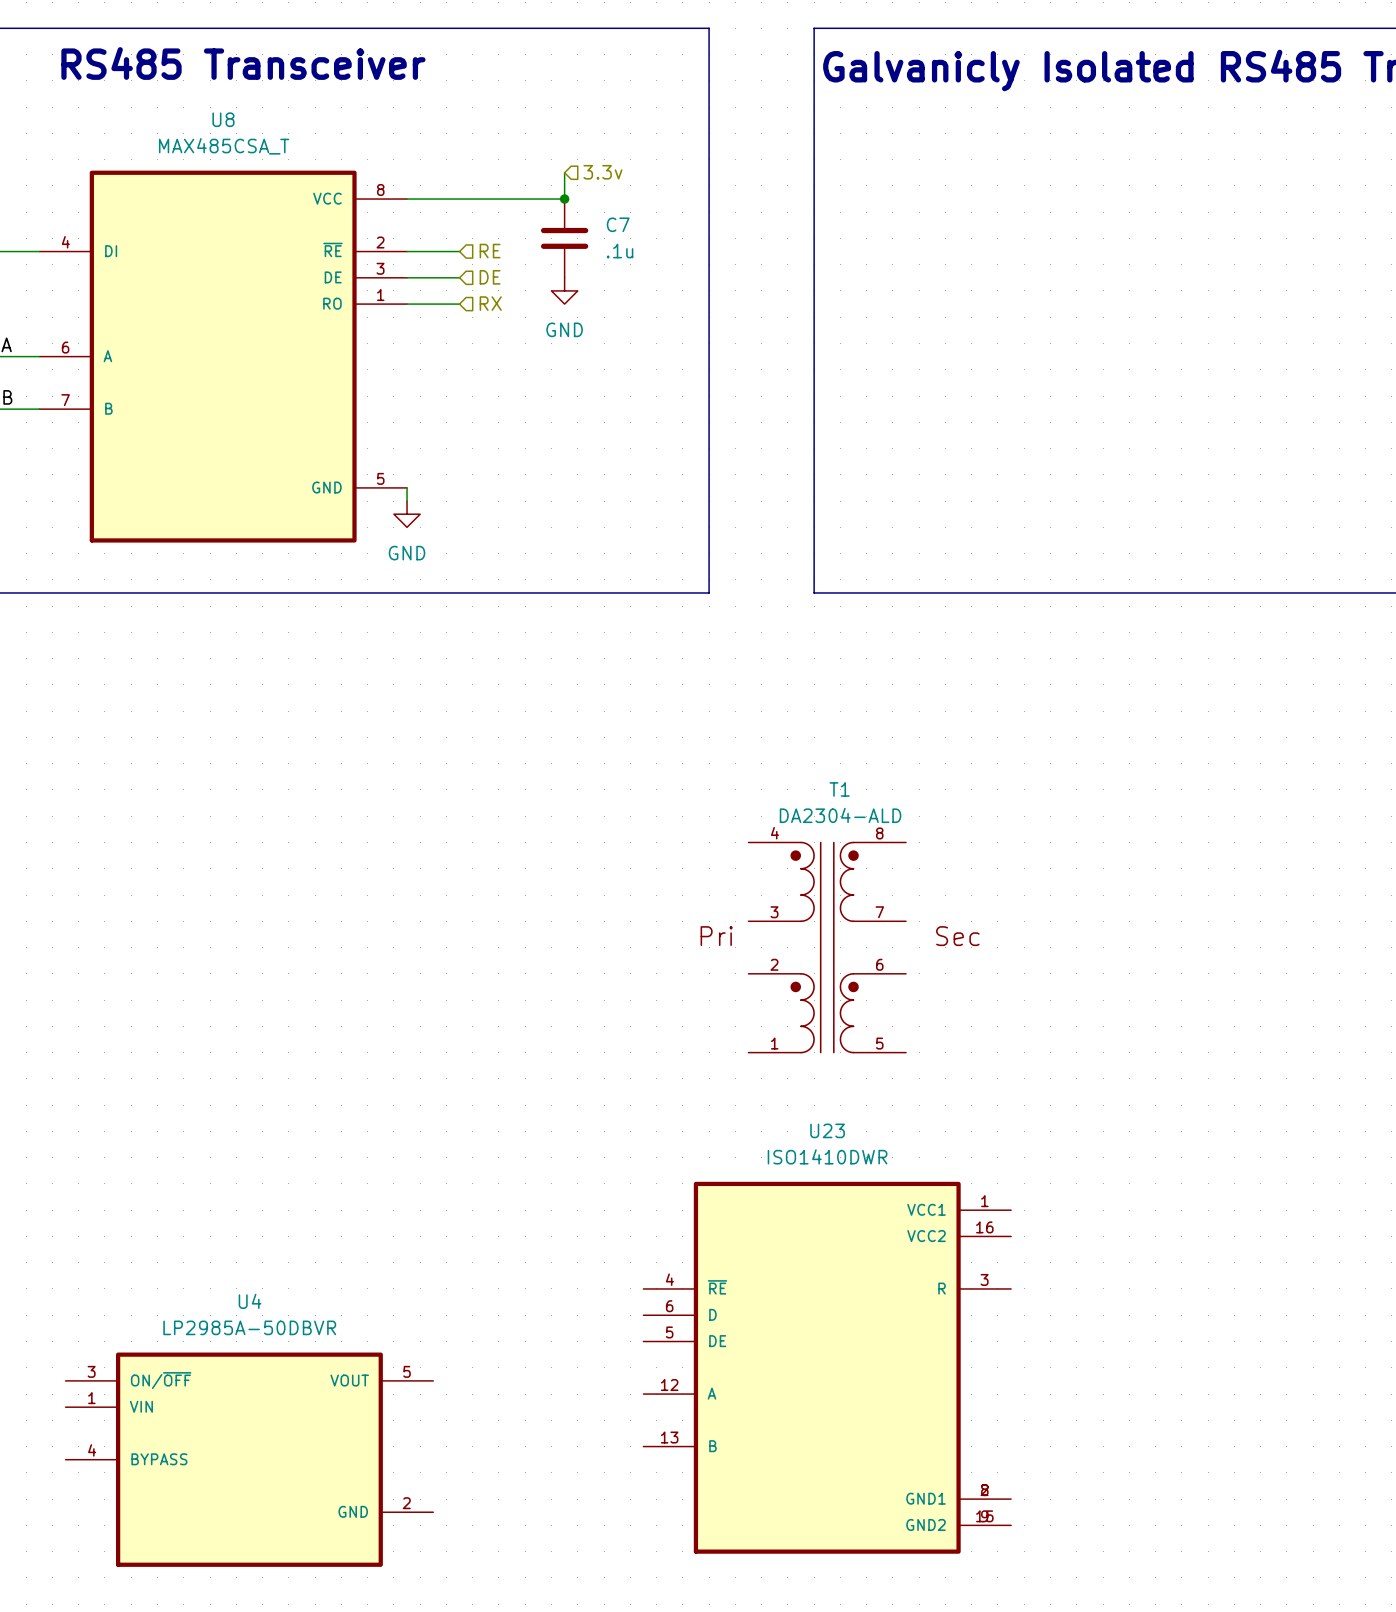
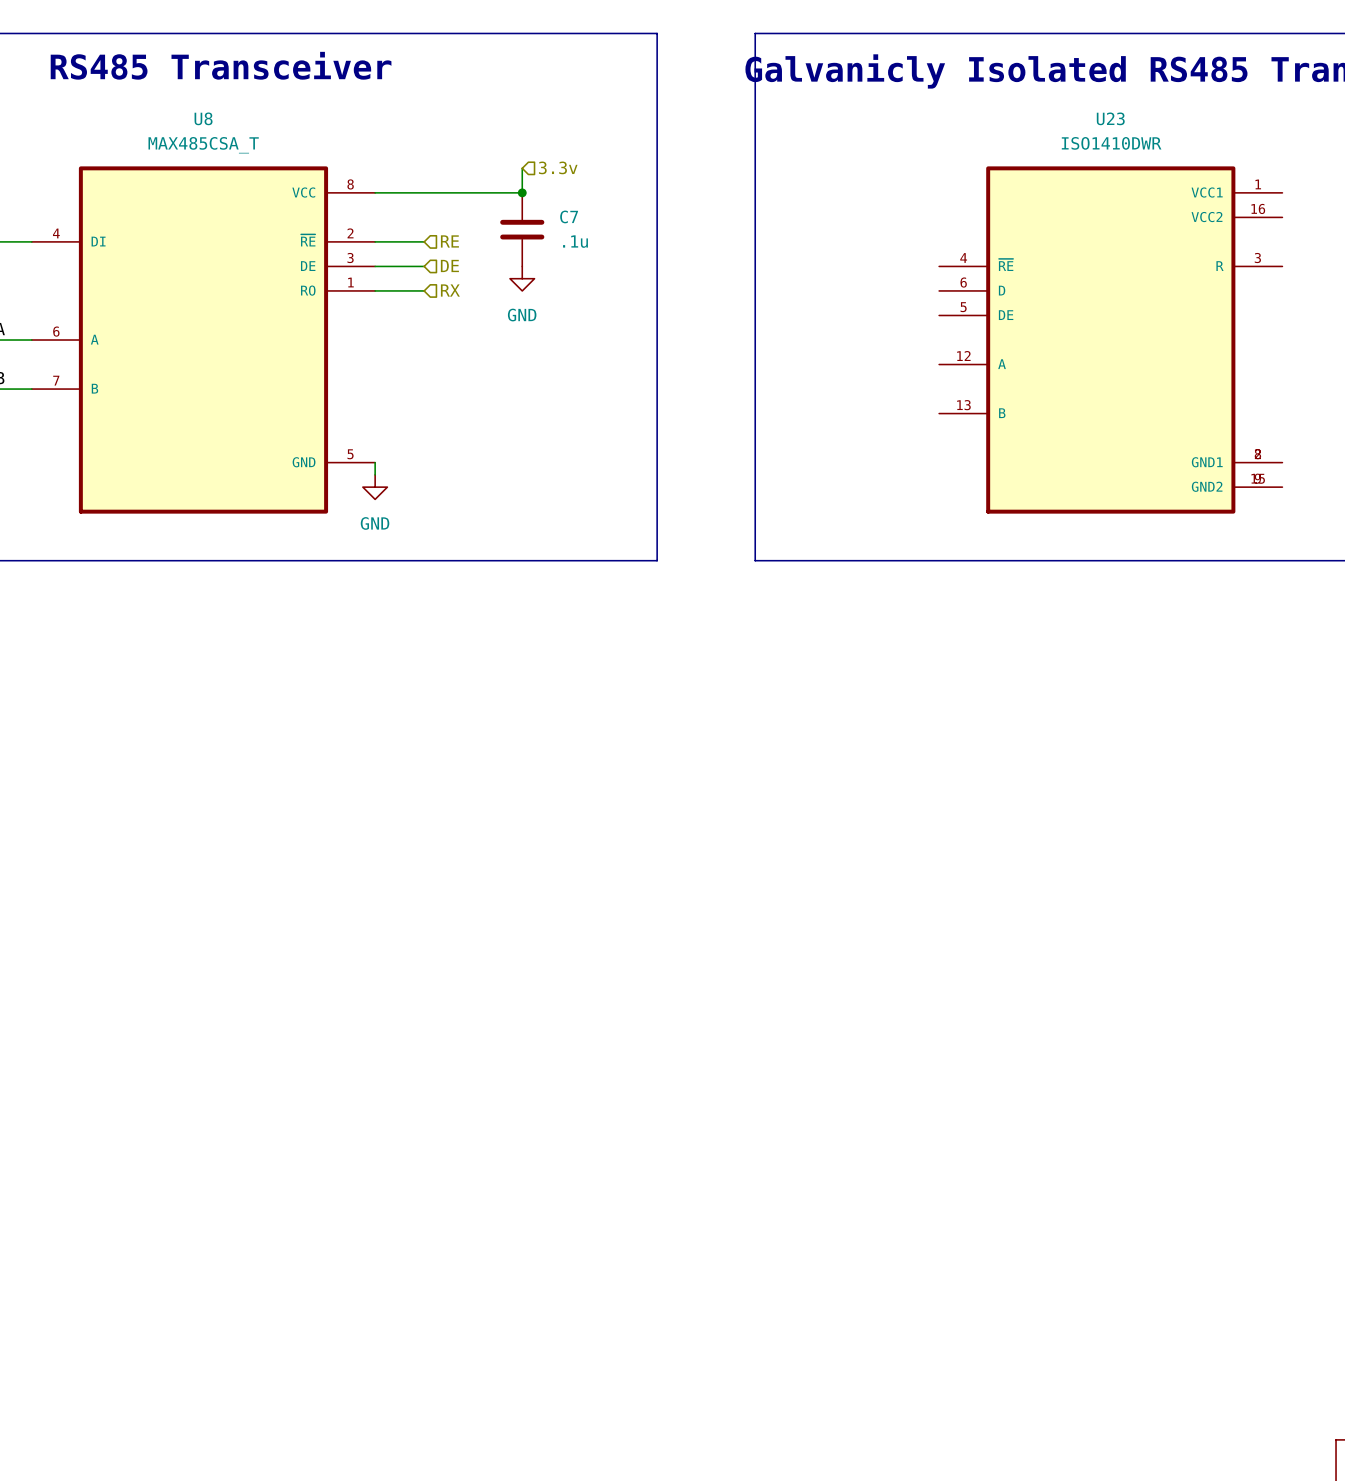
T1: DA2304-ALD (827, 947) -> none
U23 position: (827, 1367) -> (1110, 340)
U4: LP2985A-50DBVR (249, 1459) -> none

